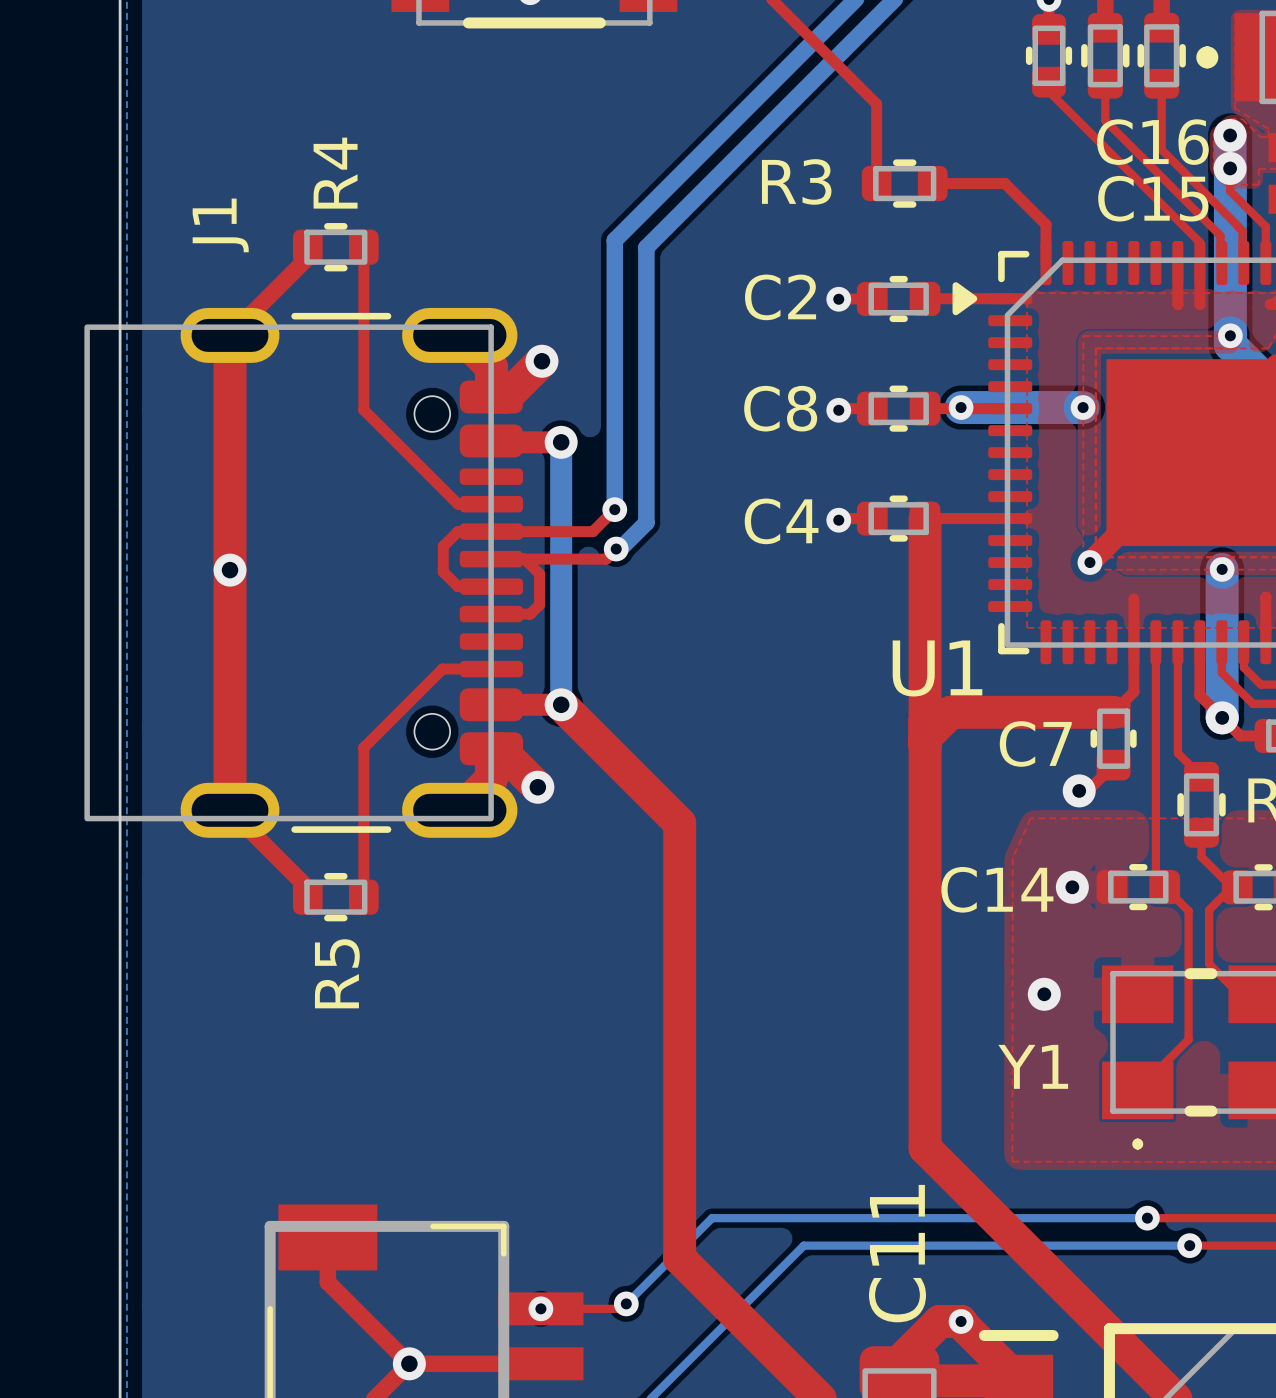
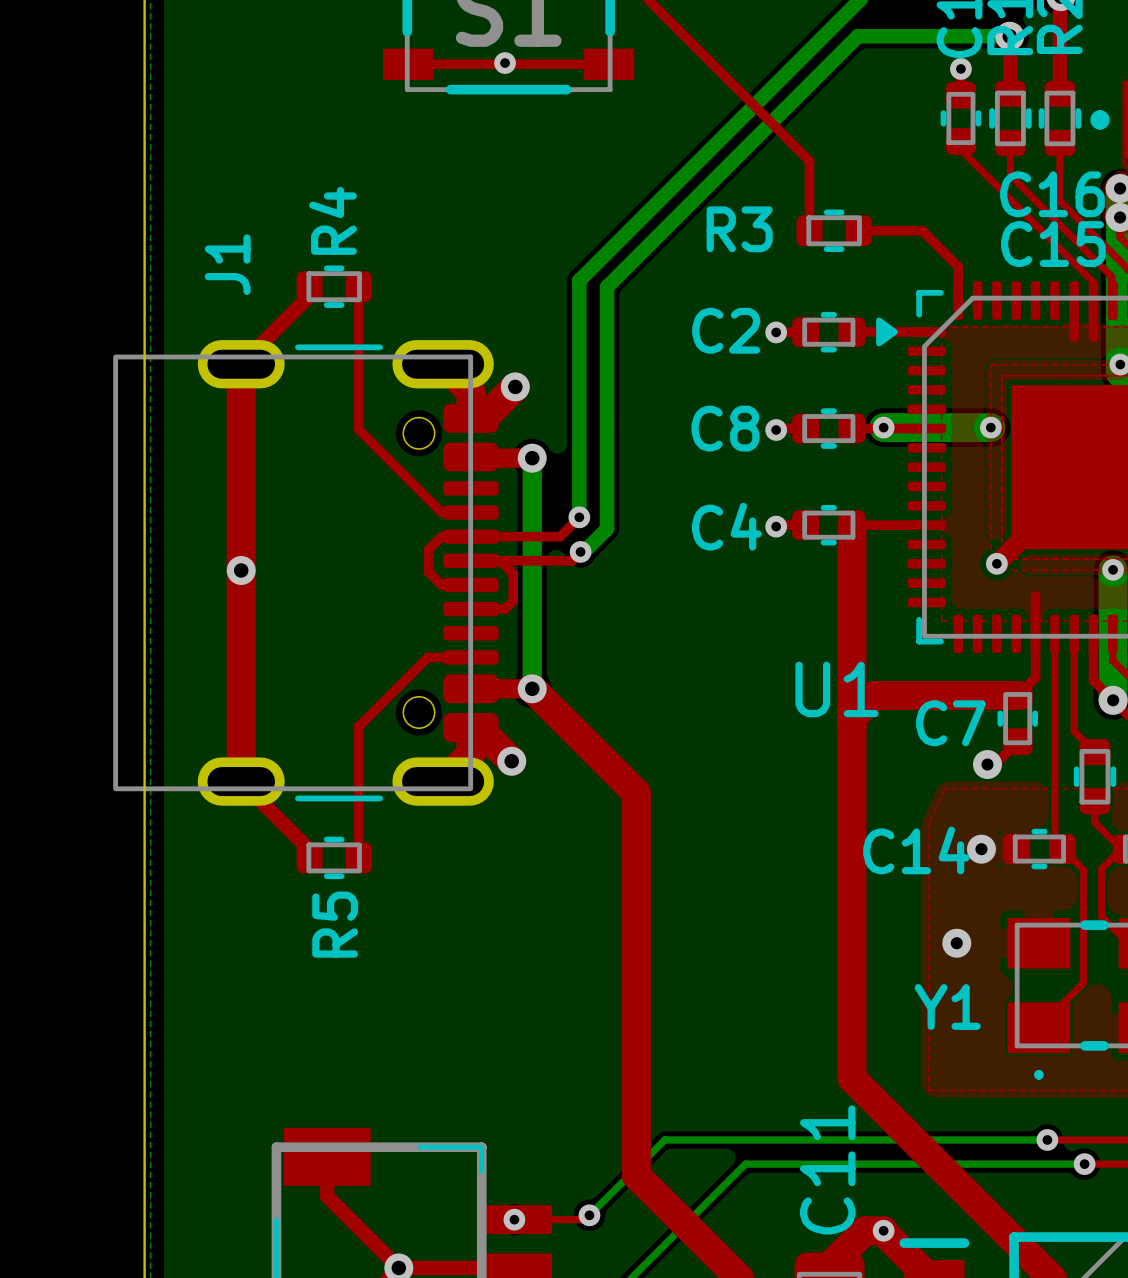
U1 name position: U1 (937, 668) -> U1 (836, 689)

